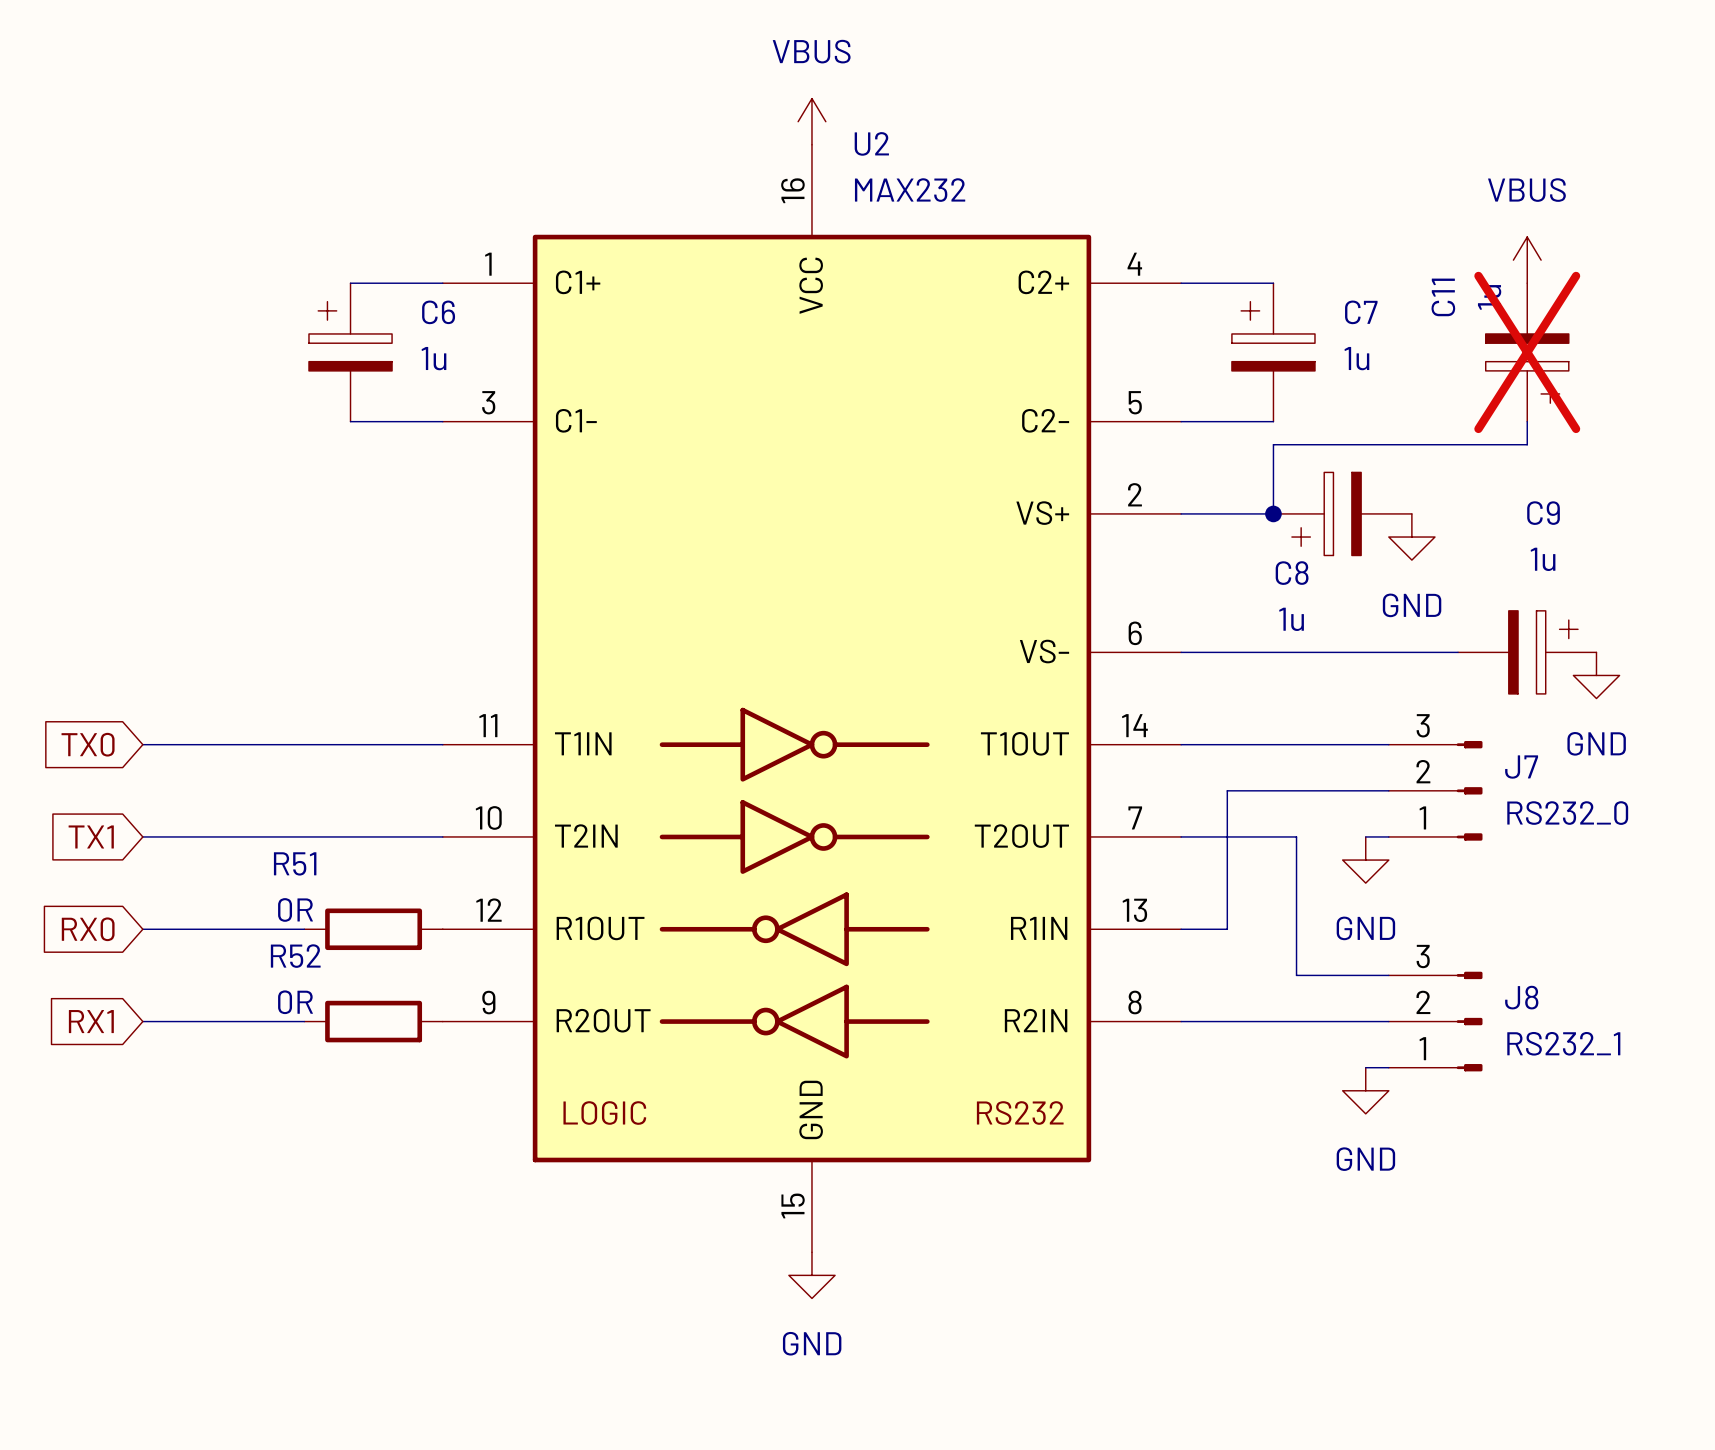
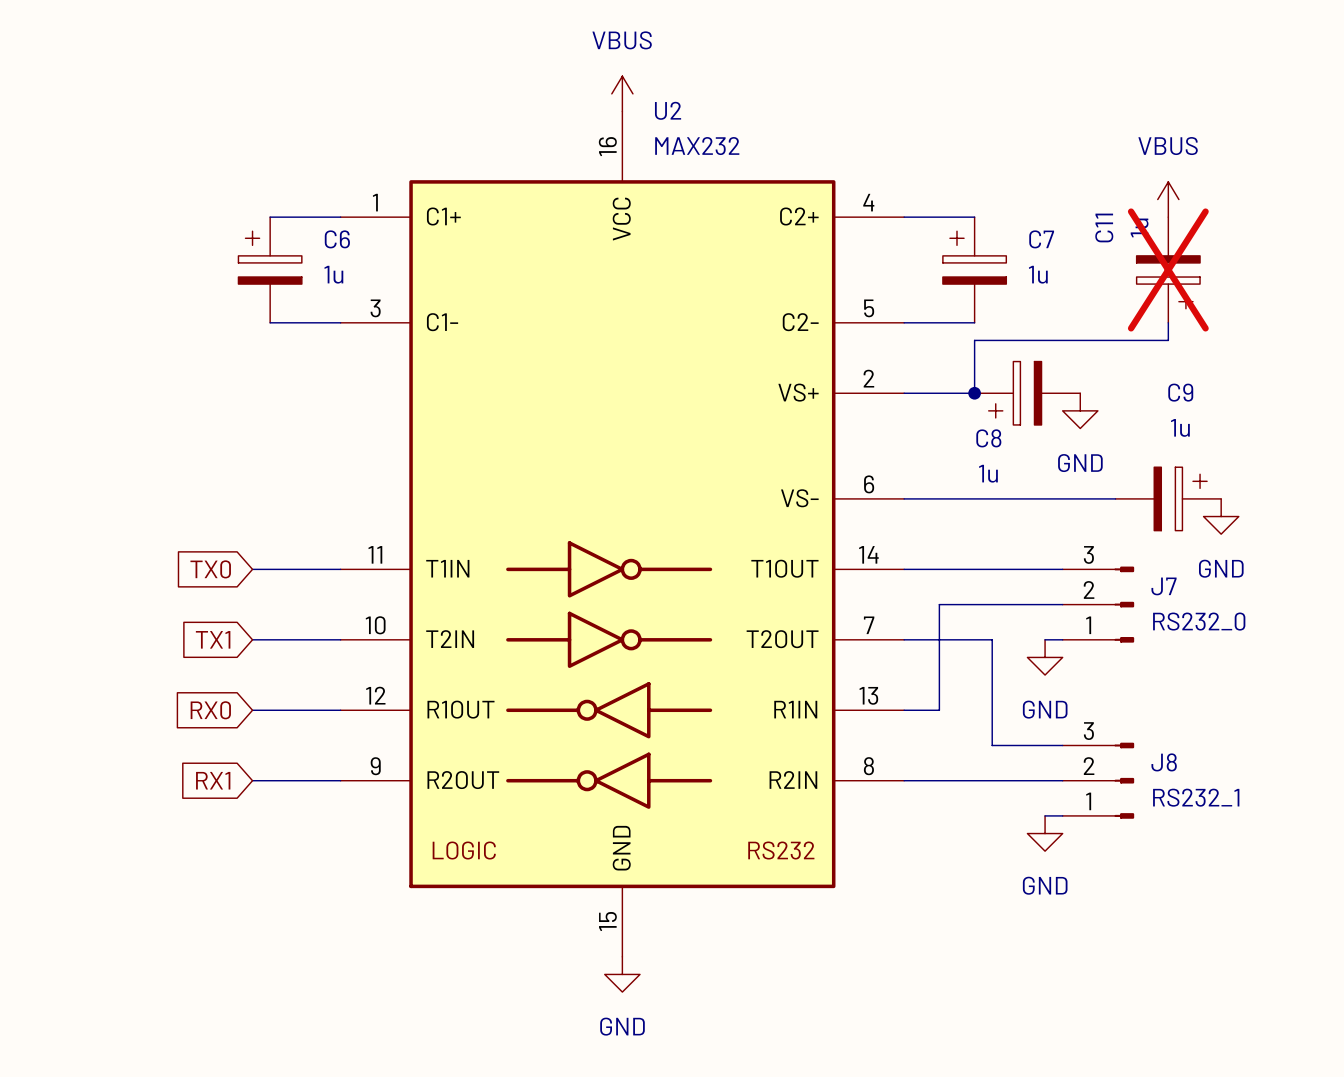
global label position: TX0 (88, 744) -> TX0 (210, 569)
wire: (142, 744) (327, 744) -> none
global label position: TX1 (91, 836) -> TX1 (213, 639)
wire: (142, 836) (327, 836) -> none
global label position: RX0 (88, 929) -> RX0 (210, 710)
wire: (142, 929) (304, 929) -> none
wire: none -> (252, 710) (340, 710)
R51: 0R (373, 929) -> none
global label position: RX1 (91, 1021) -> RX1 (213, 780)
wire: (142, 1021) (304, 1021) -> none
wire: none -> (252, 780) (340, 780)
R52: 0R (373, 1021) -> none

